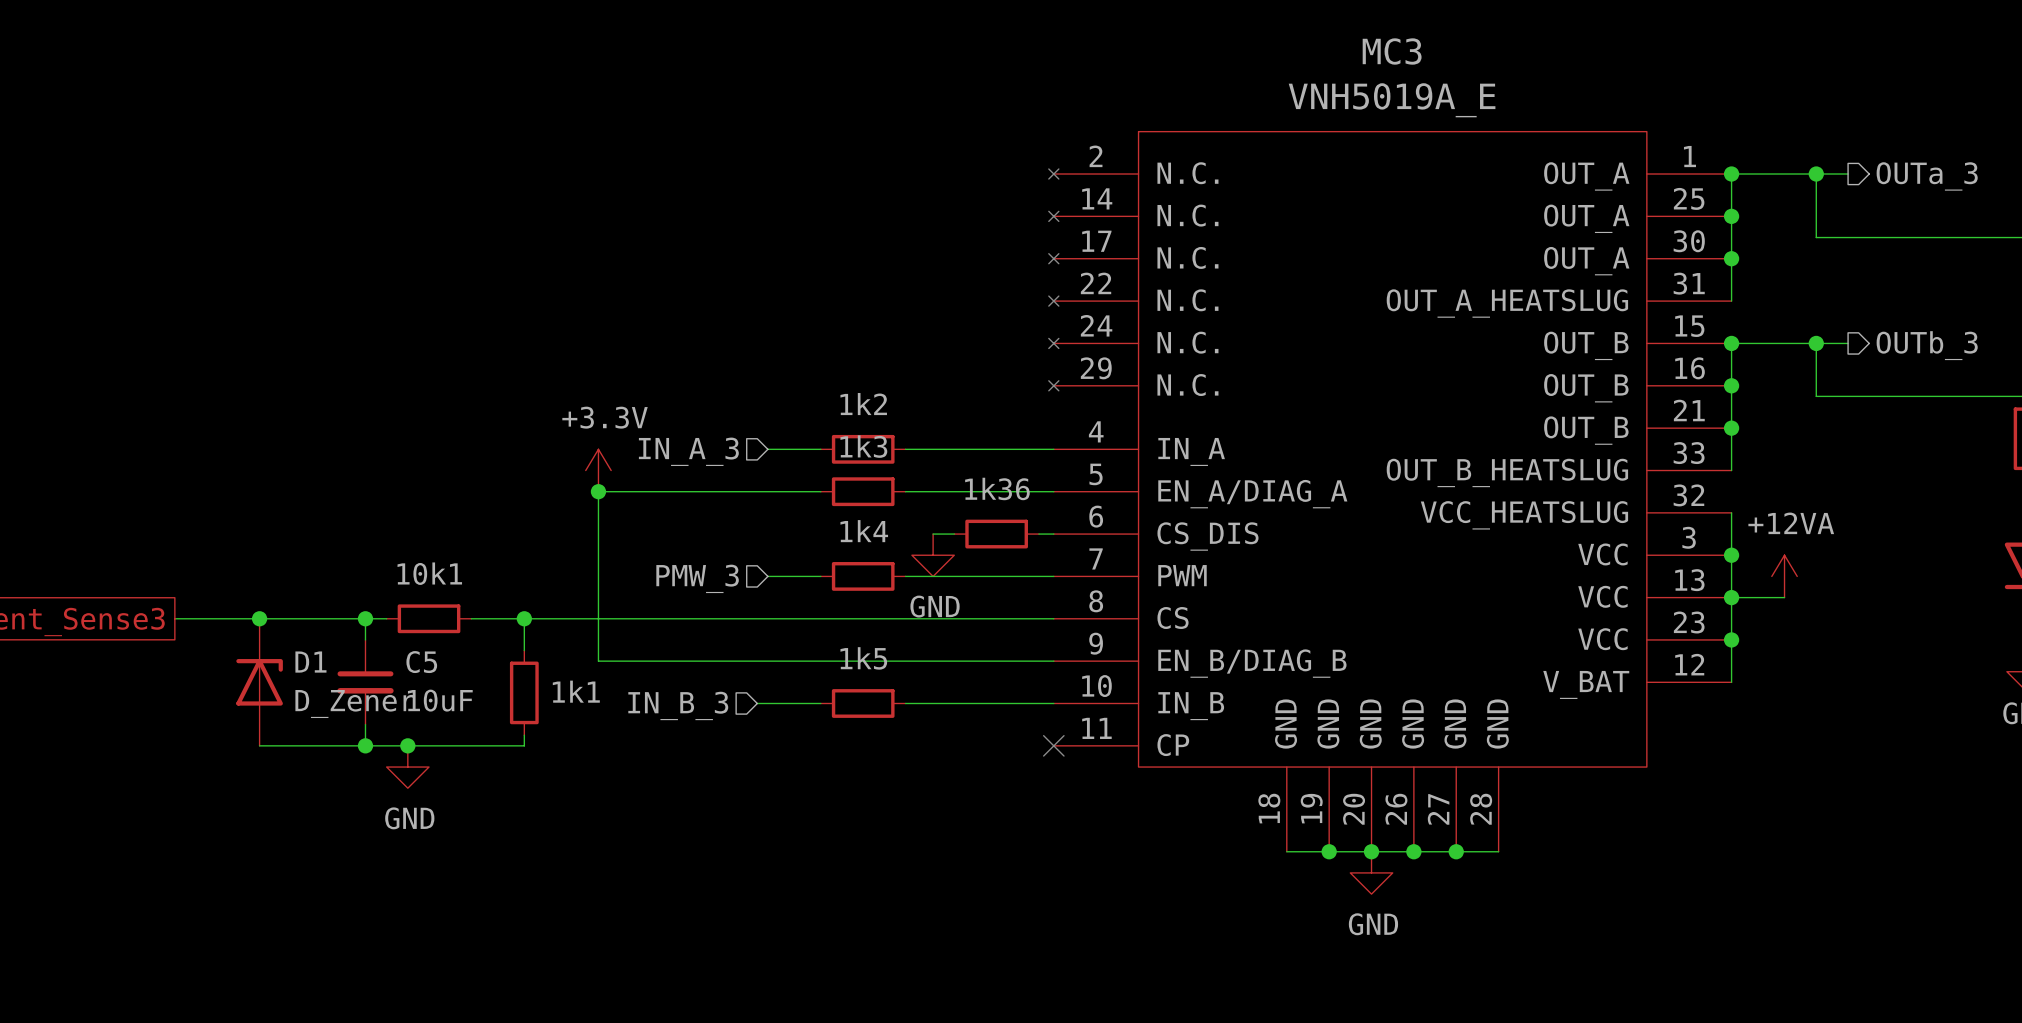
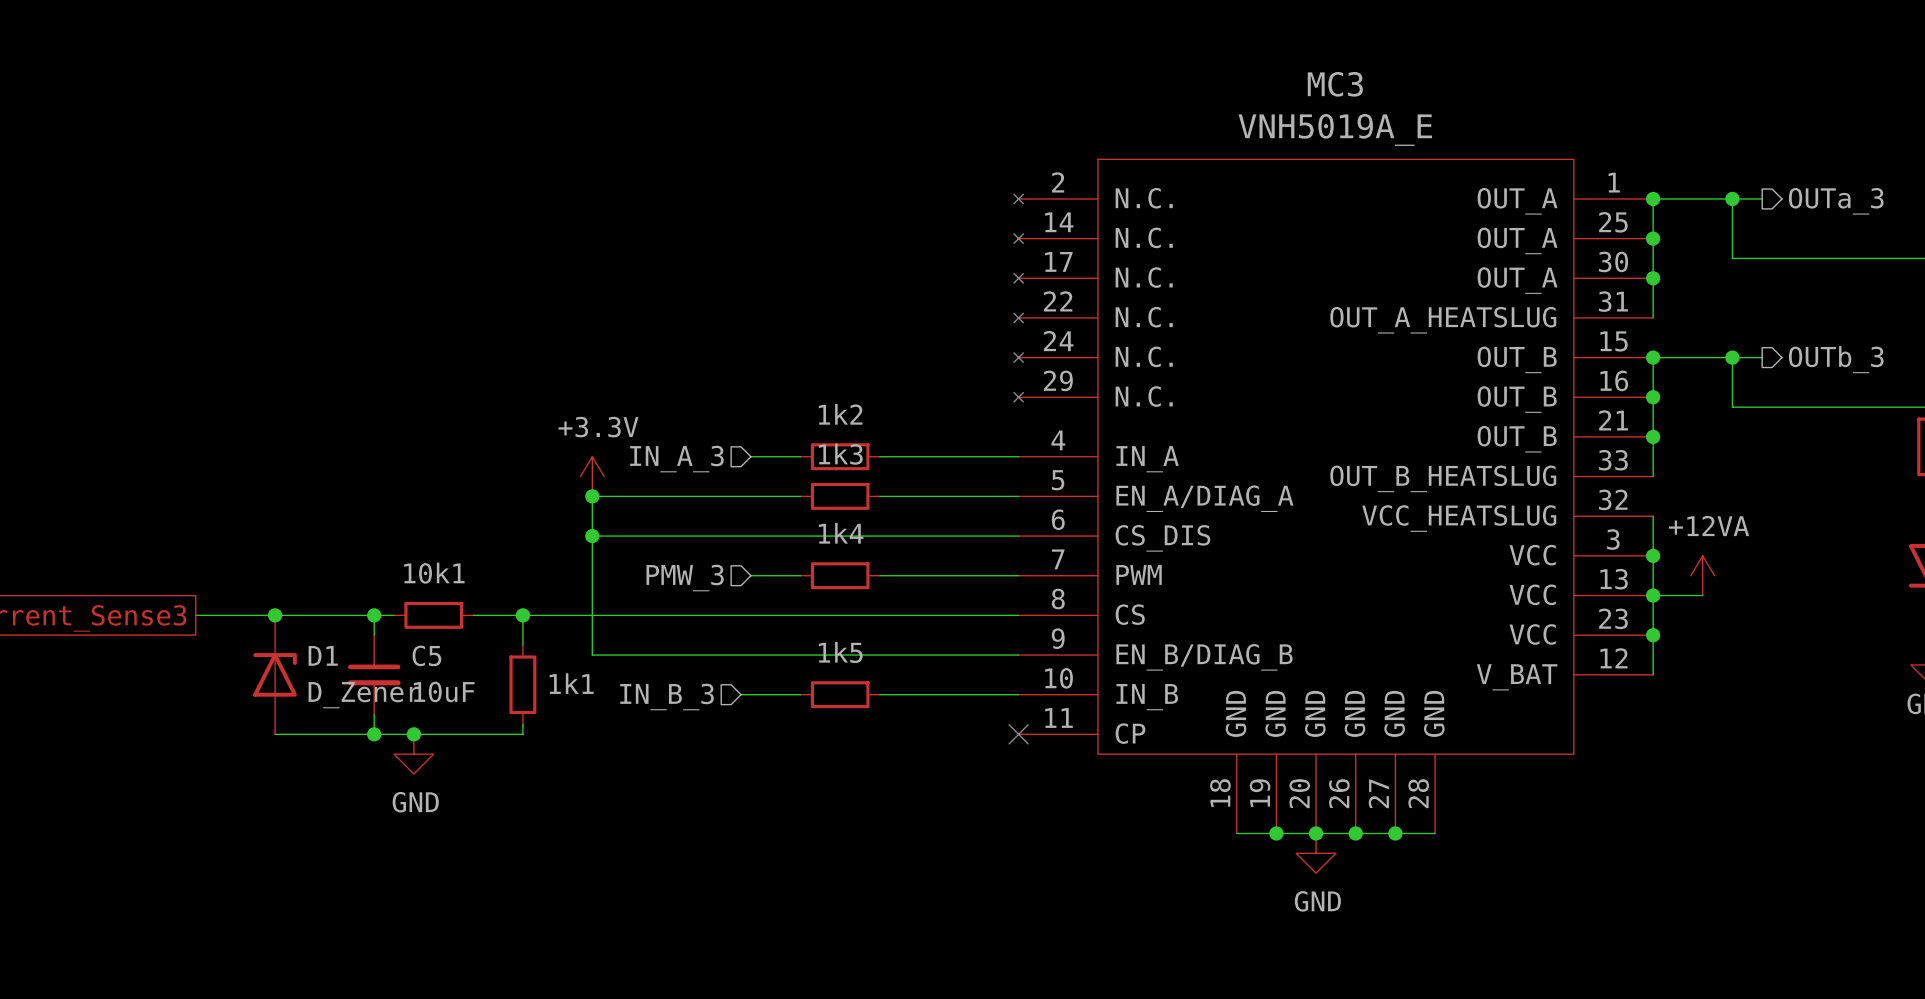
wire: none -> (592, 536) (905, 536)
junction: none -> (592, 536)
wire: none -> (925, 536) (1004, 536)
1k36: (996, 534) -> none
power symbol: GND (933, 555) -> none

